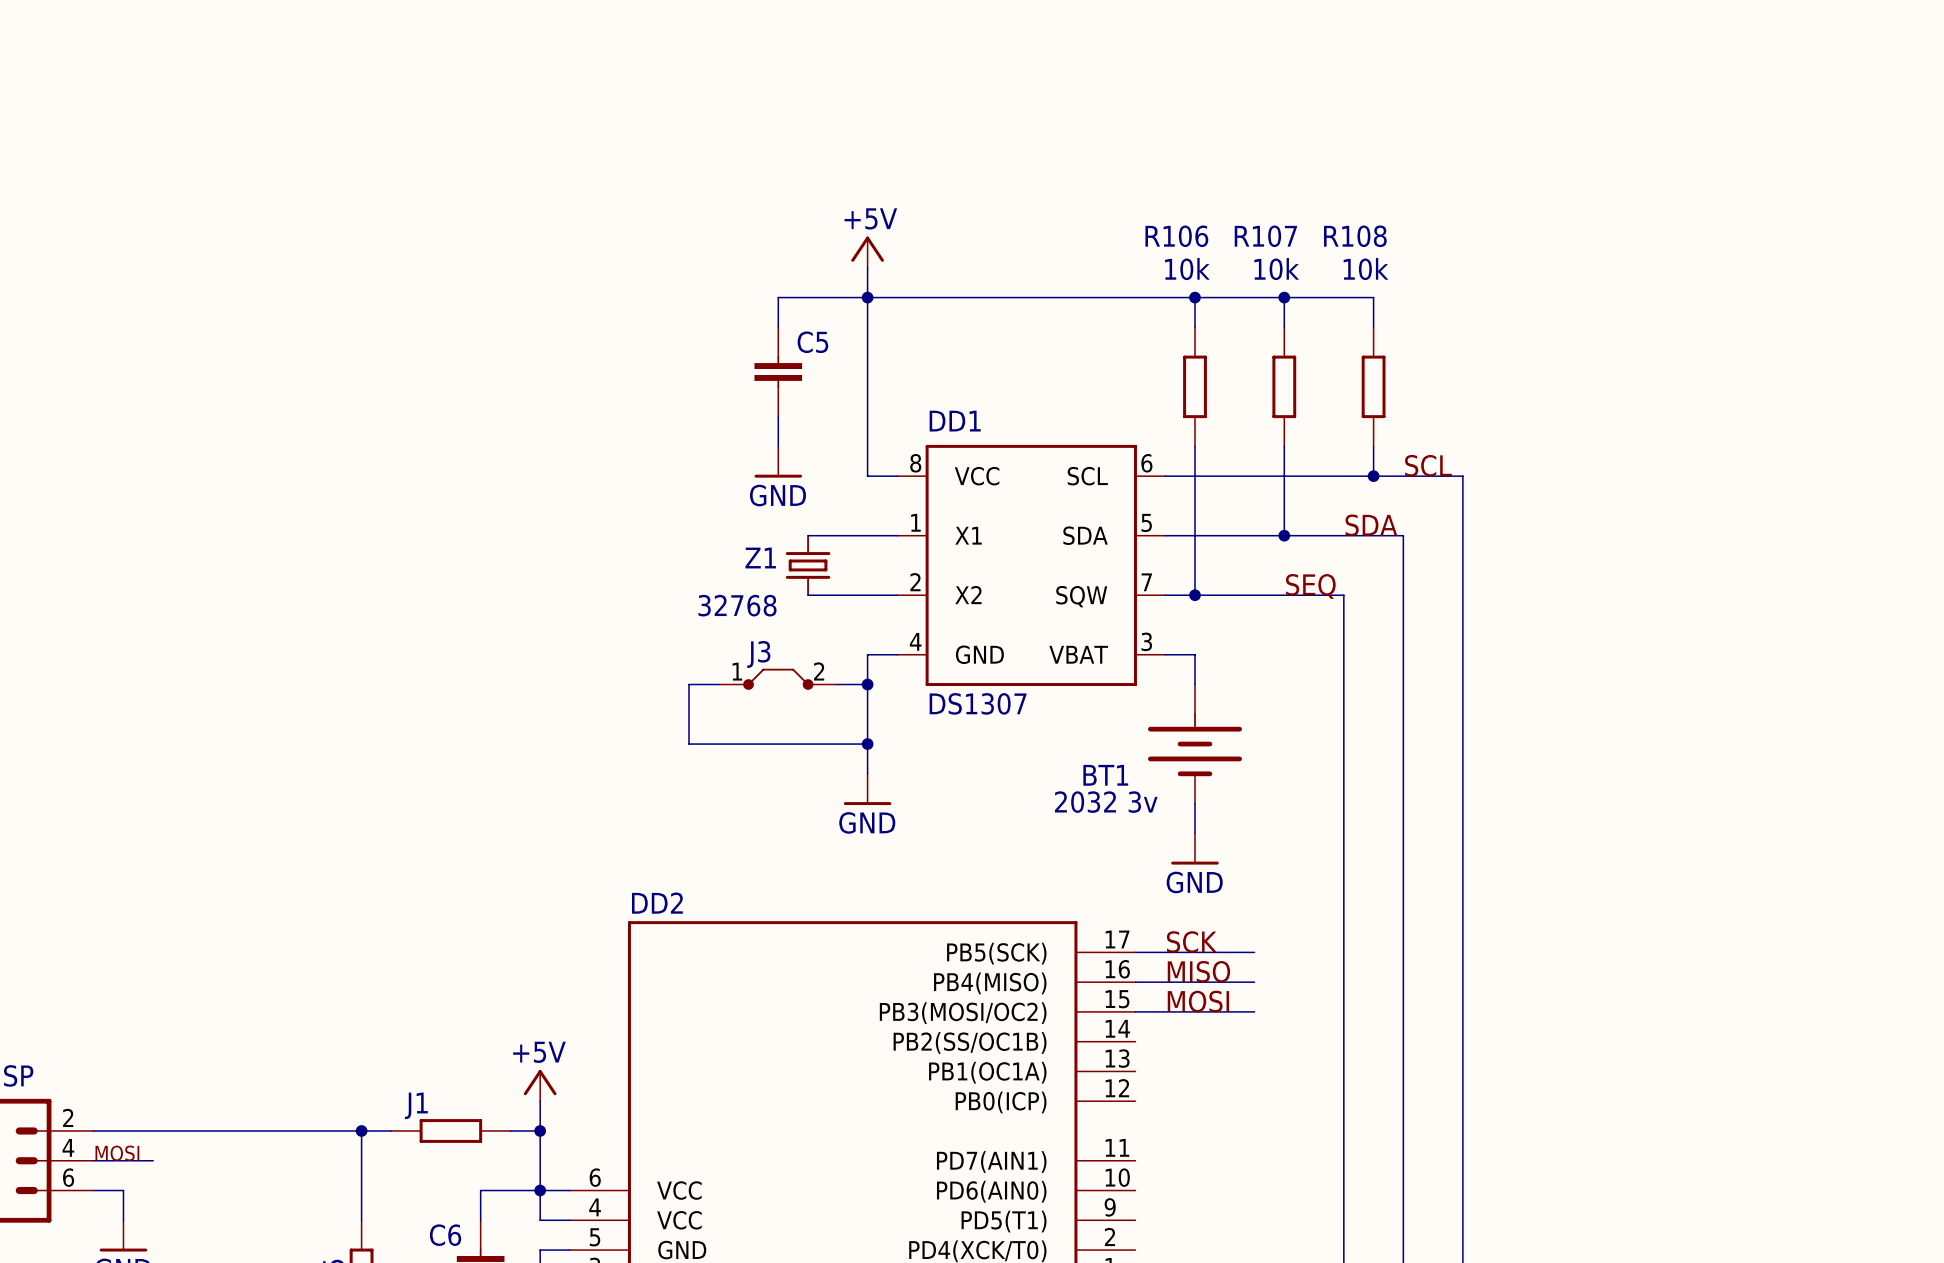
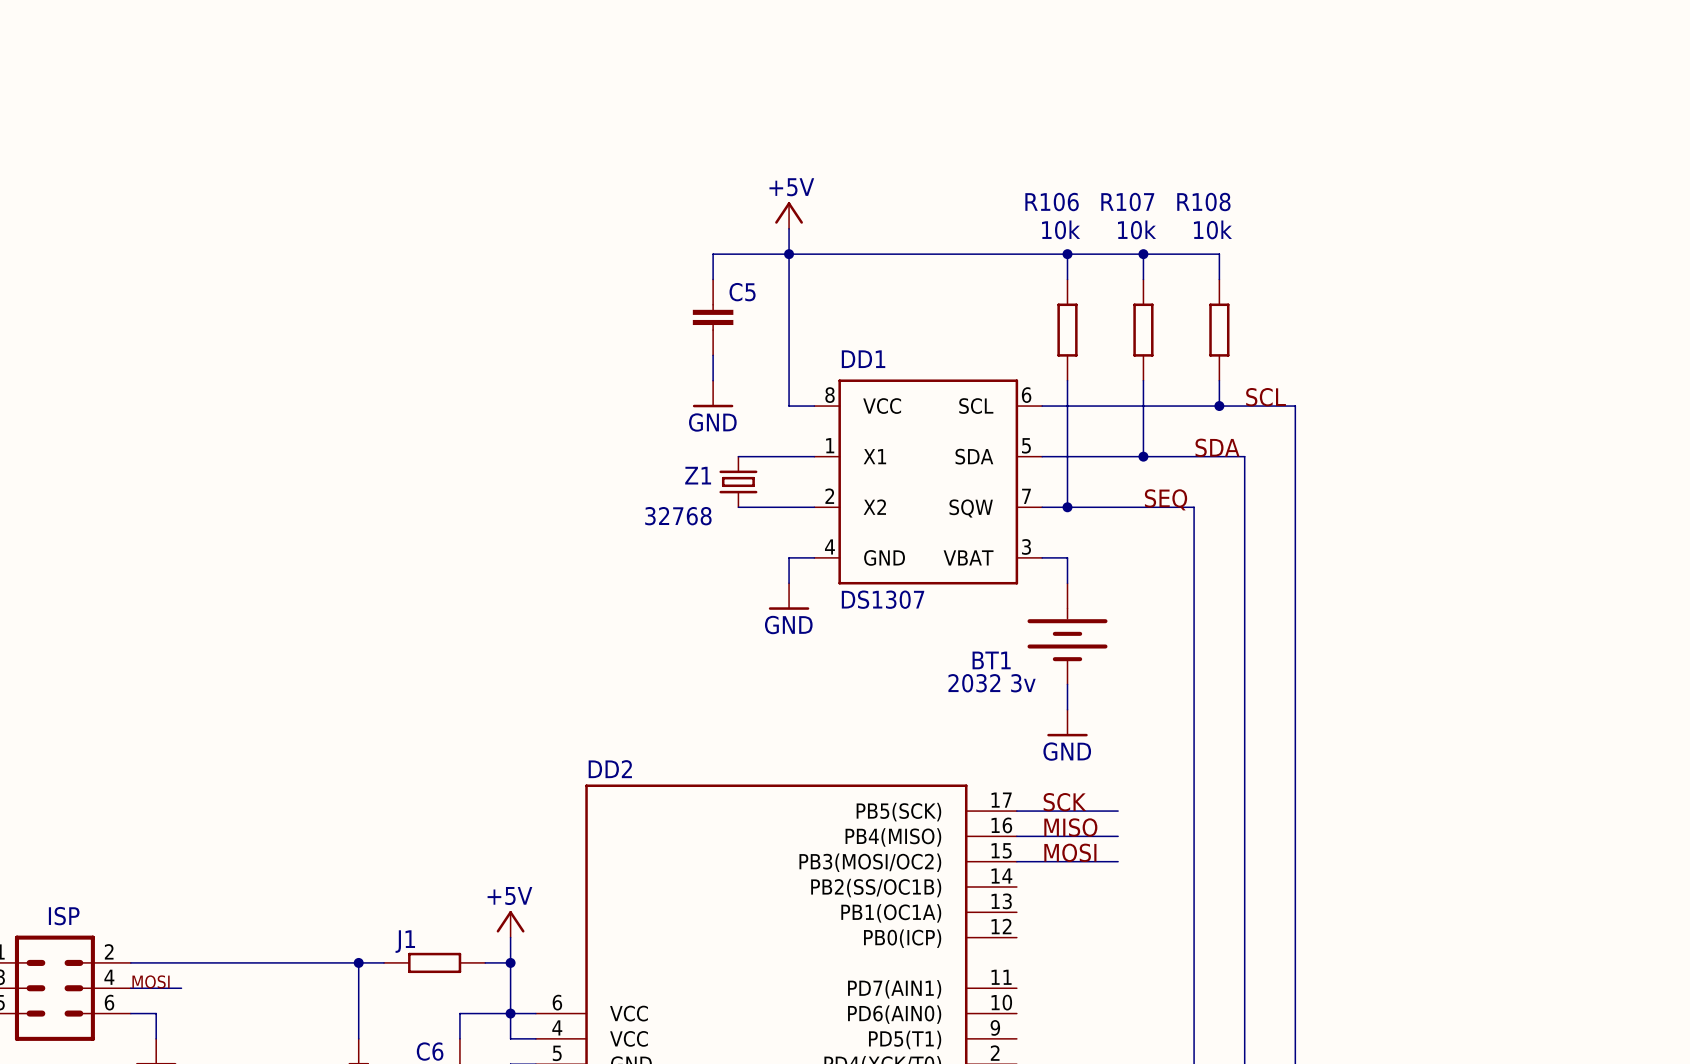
J3: (778, 679) -> none
wire: (718, 684) (689, 684) (689, 744) (867, 744) -> none
wire: (837, 684) (867, 684) (867, 773) -> none
junction: (867, 684) -> none
junction: (867, 744) -> none
power symbol position: GND (867, 789) -> GND (789, 596)

